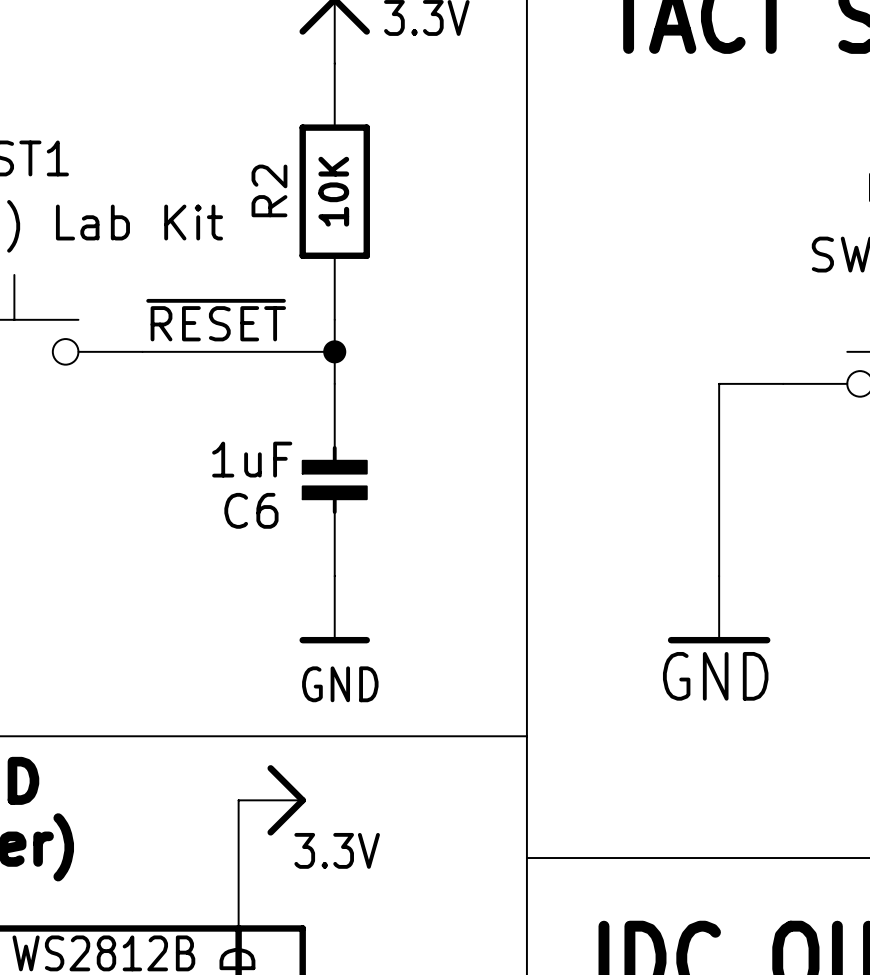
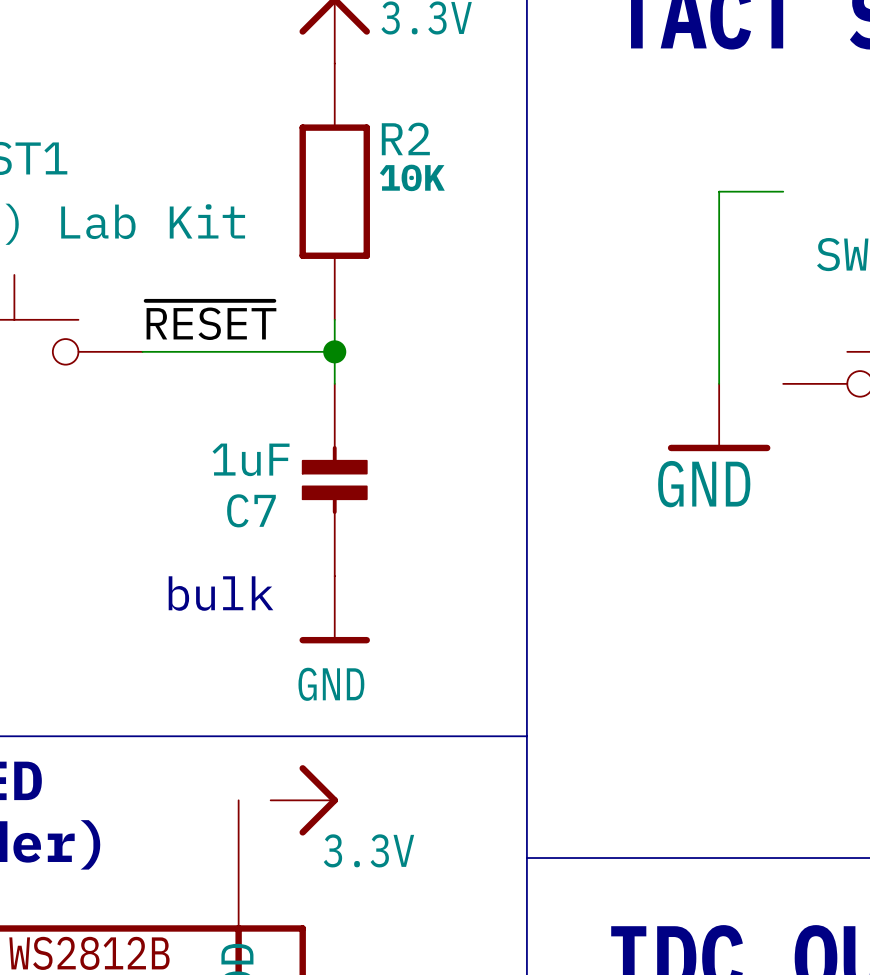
R2 name rotation: 0° (269, 190) -> 90° clockwise (405, 138)
R2 name position: R2 (269, 190) -> R2 (405, 138)
R2 value rotation: 0° (333, 191) -> 90° clockwise (412, 177)
wire: (783, 383) (719, 383) (719, 576) -> (783, 191) (719, 191) (719, 383)
C6 name: C6 (251, 510) -> C7 (251, 510)
text: none -> bulk (220, 593)
power symbol position: GND (719, 609) -> GND (719, 417)
power symbol position: 3.3V (272, 800) -> 3.3V (304, 800)

